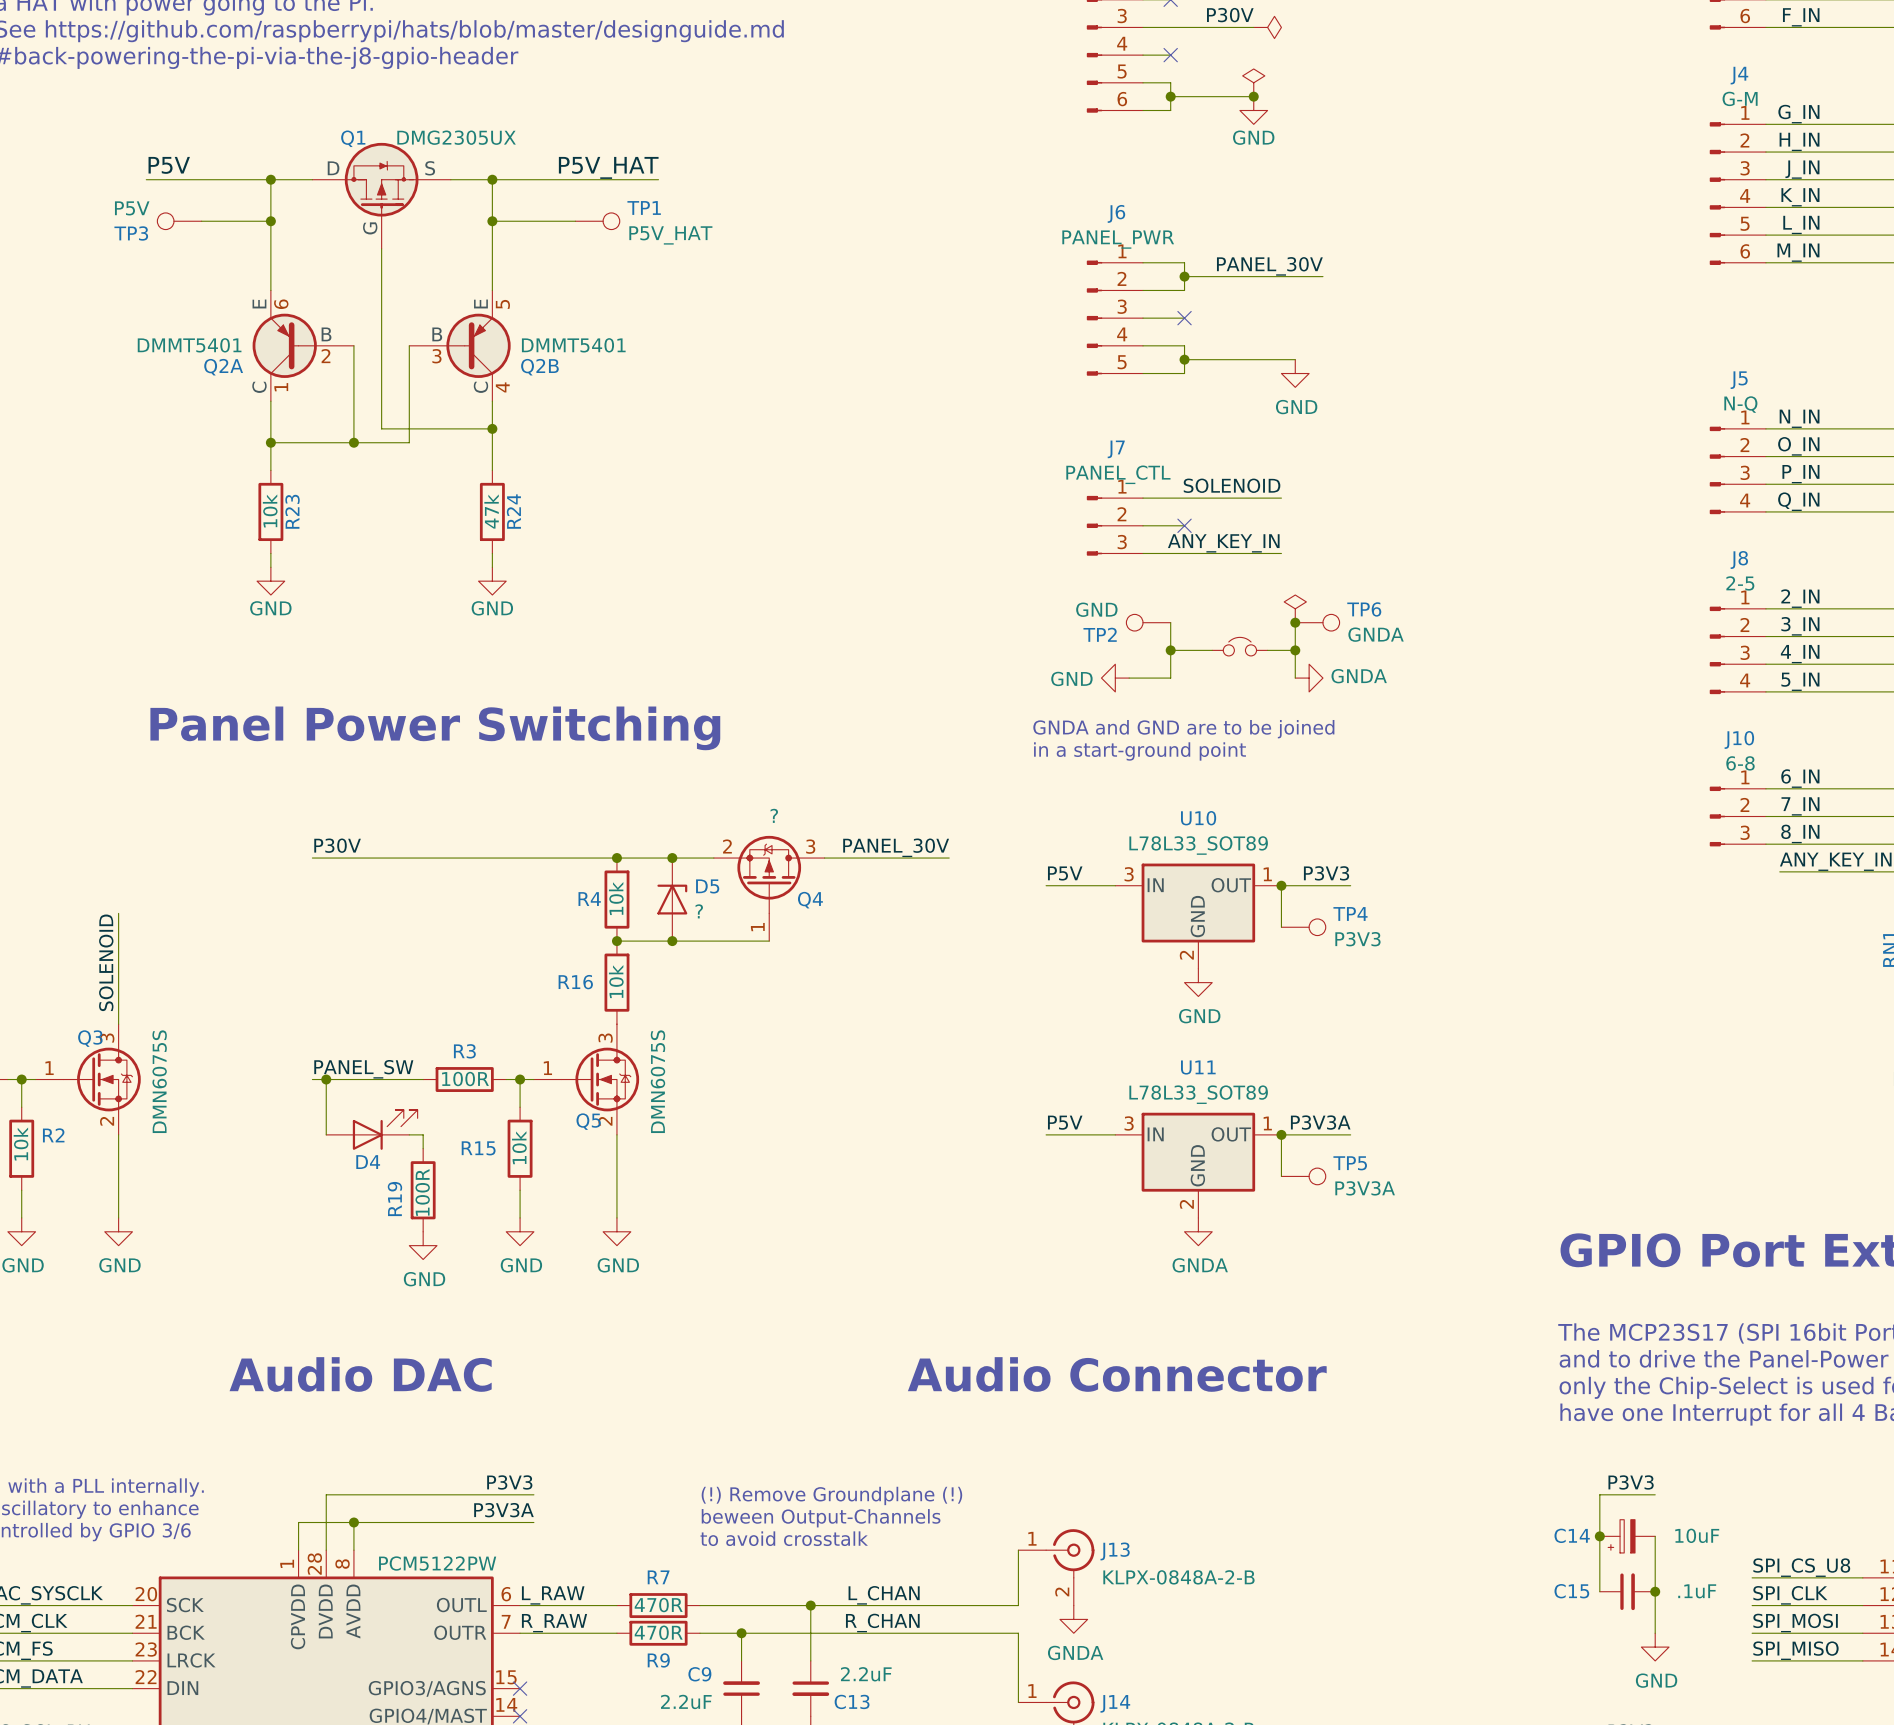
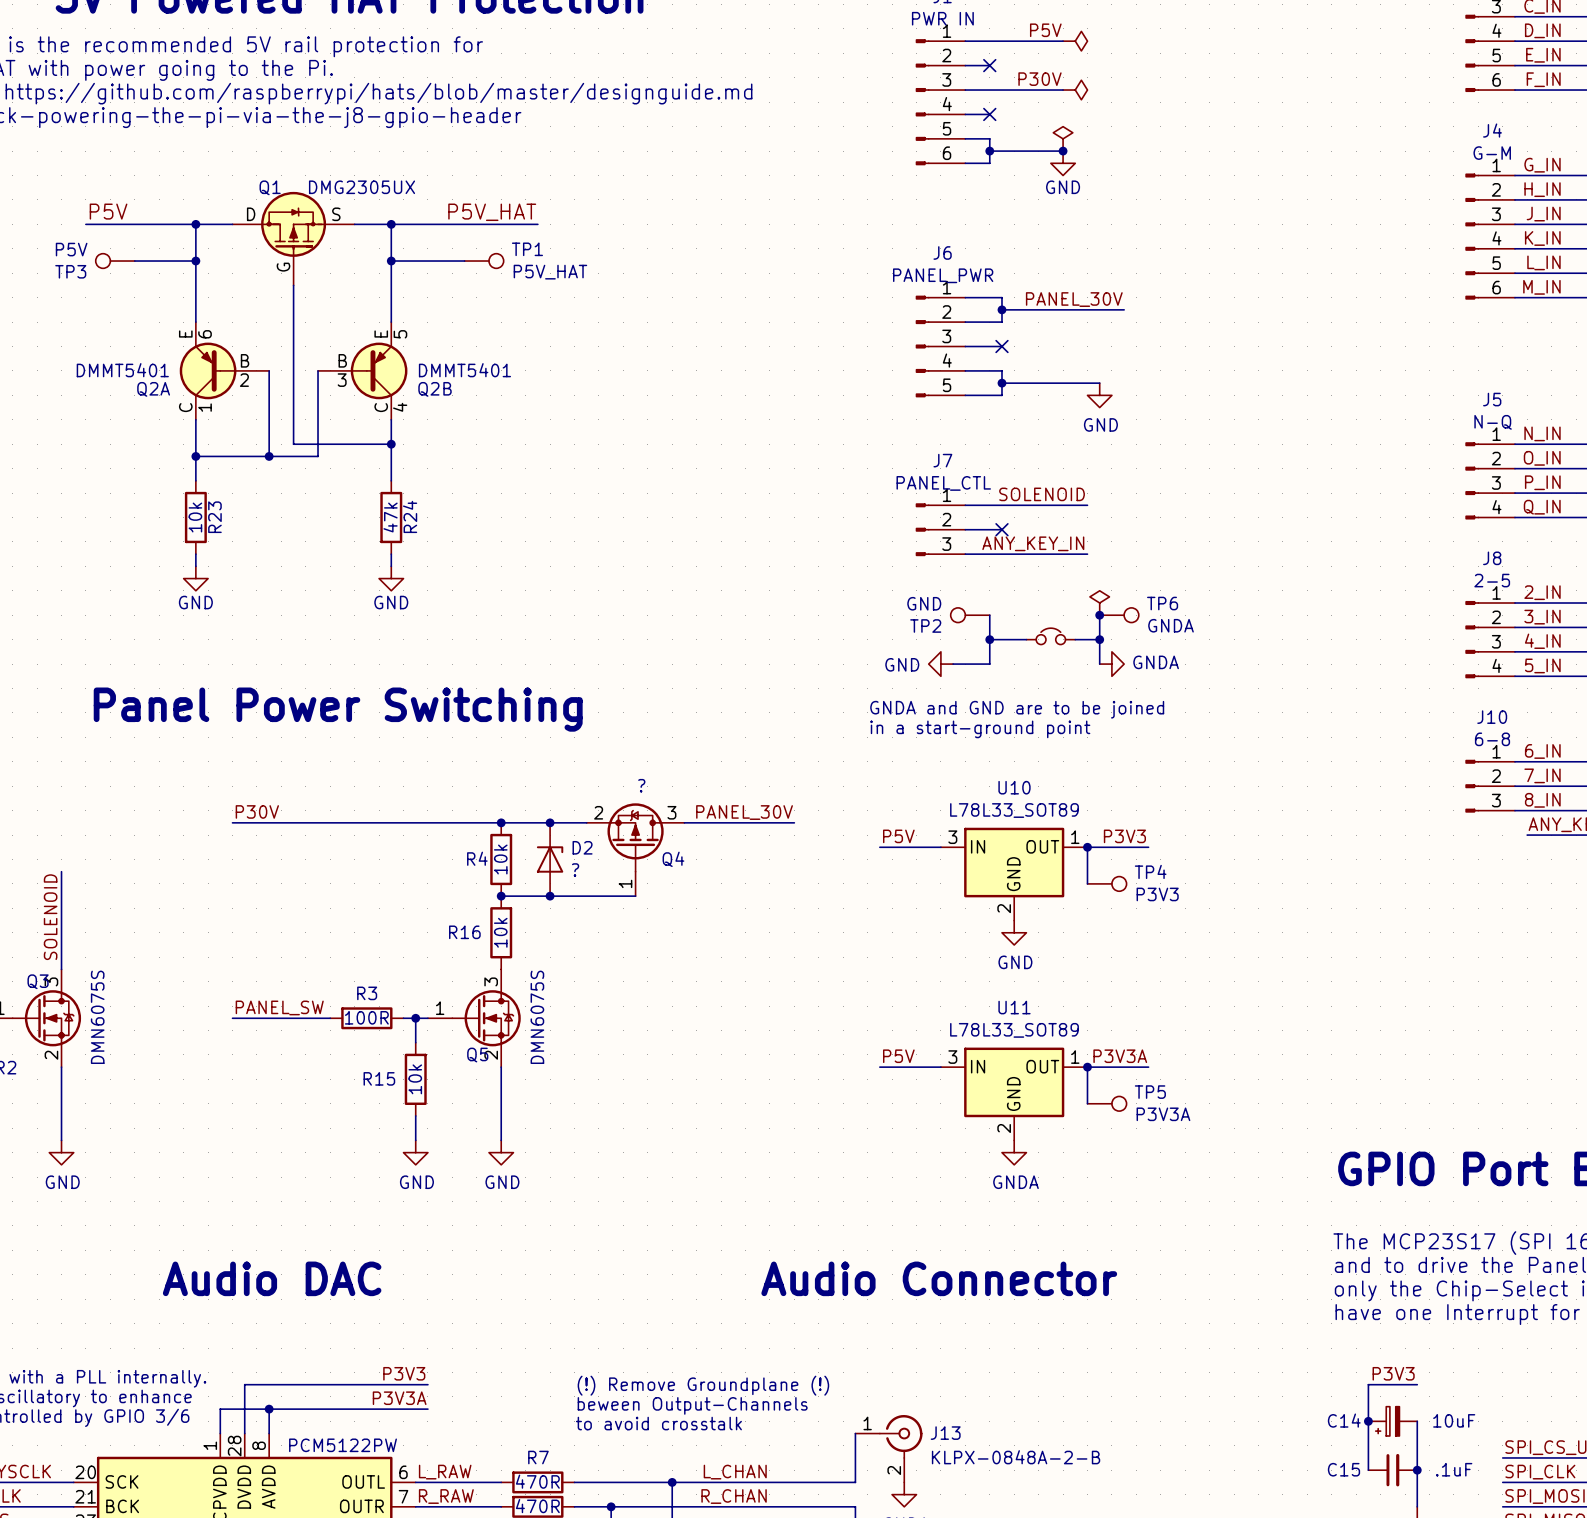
D5 name: D5 (707, 886) -> D2 (582, 847)
wire: (326, 1079) (326, 1134) -> none
junction: (326, 1079) -> none
D4: (371, 1129) -> none
wire: (409, 1134) (423, 1134) (423, 1148) -> none
R19: 100R (423, 1190) -> none
power symbol: GND (423, 1245) -> none

